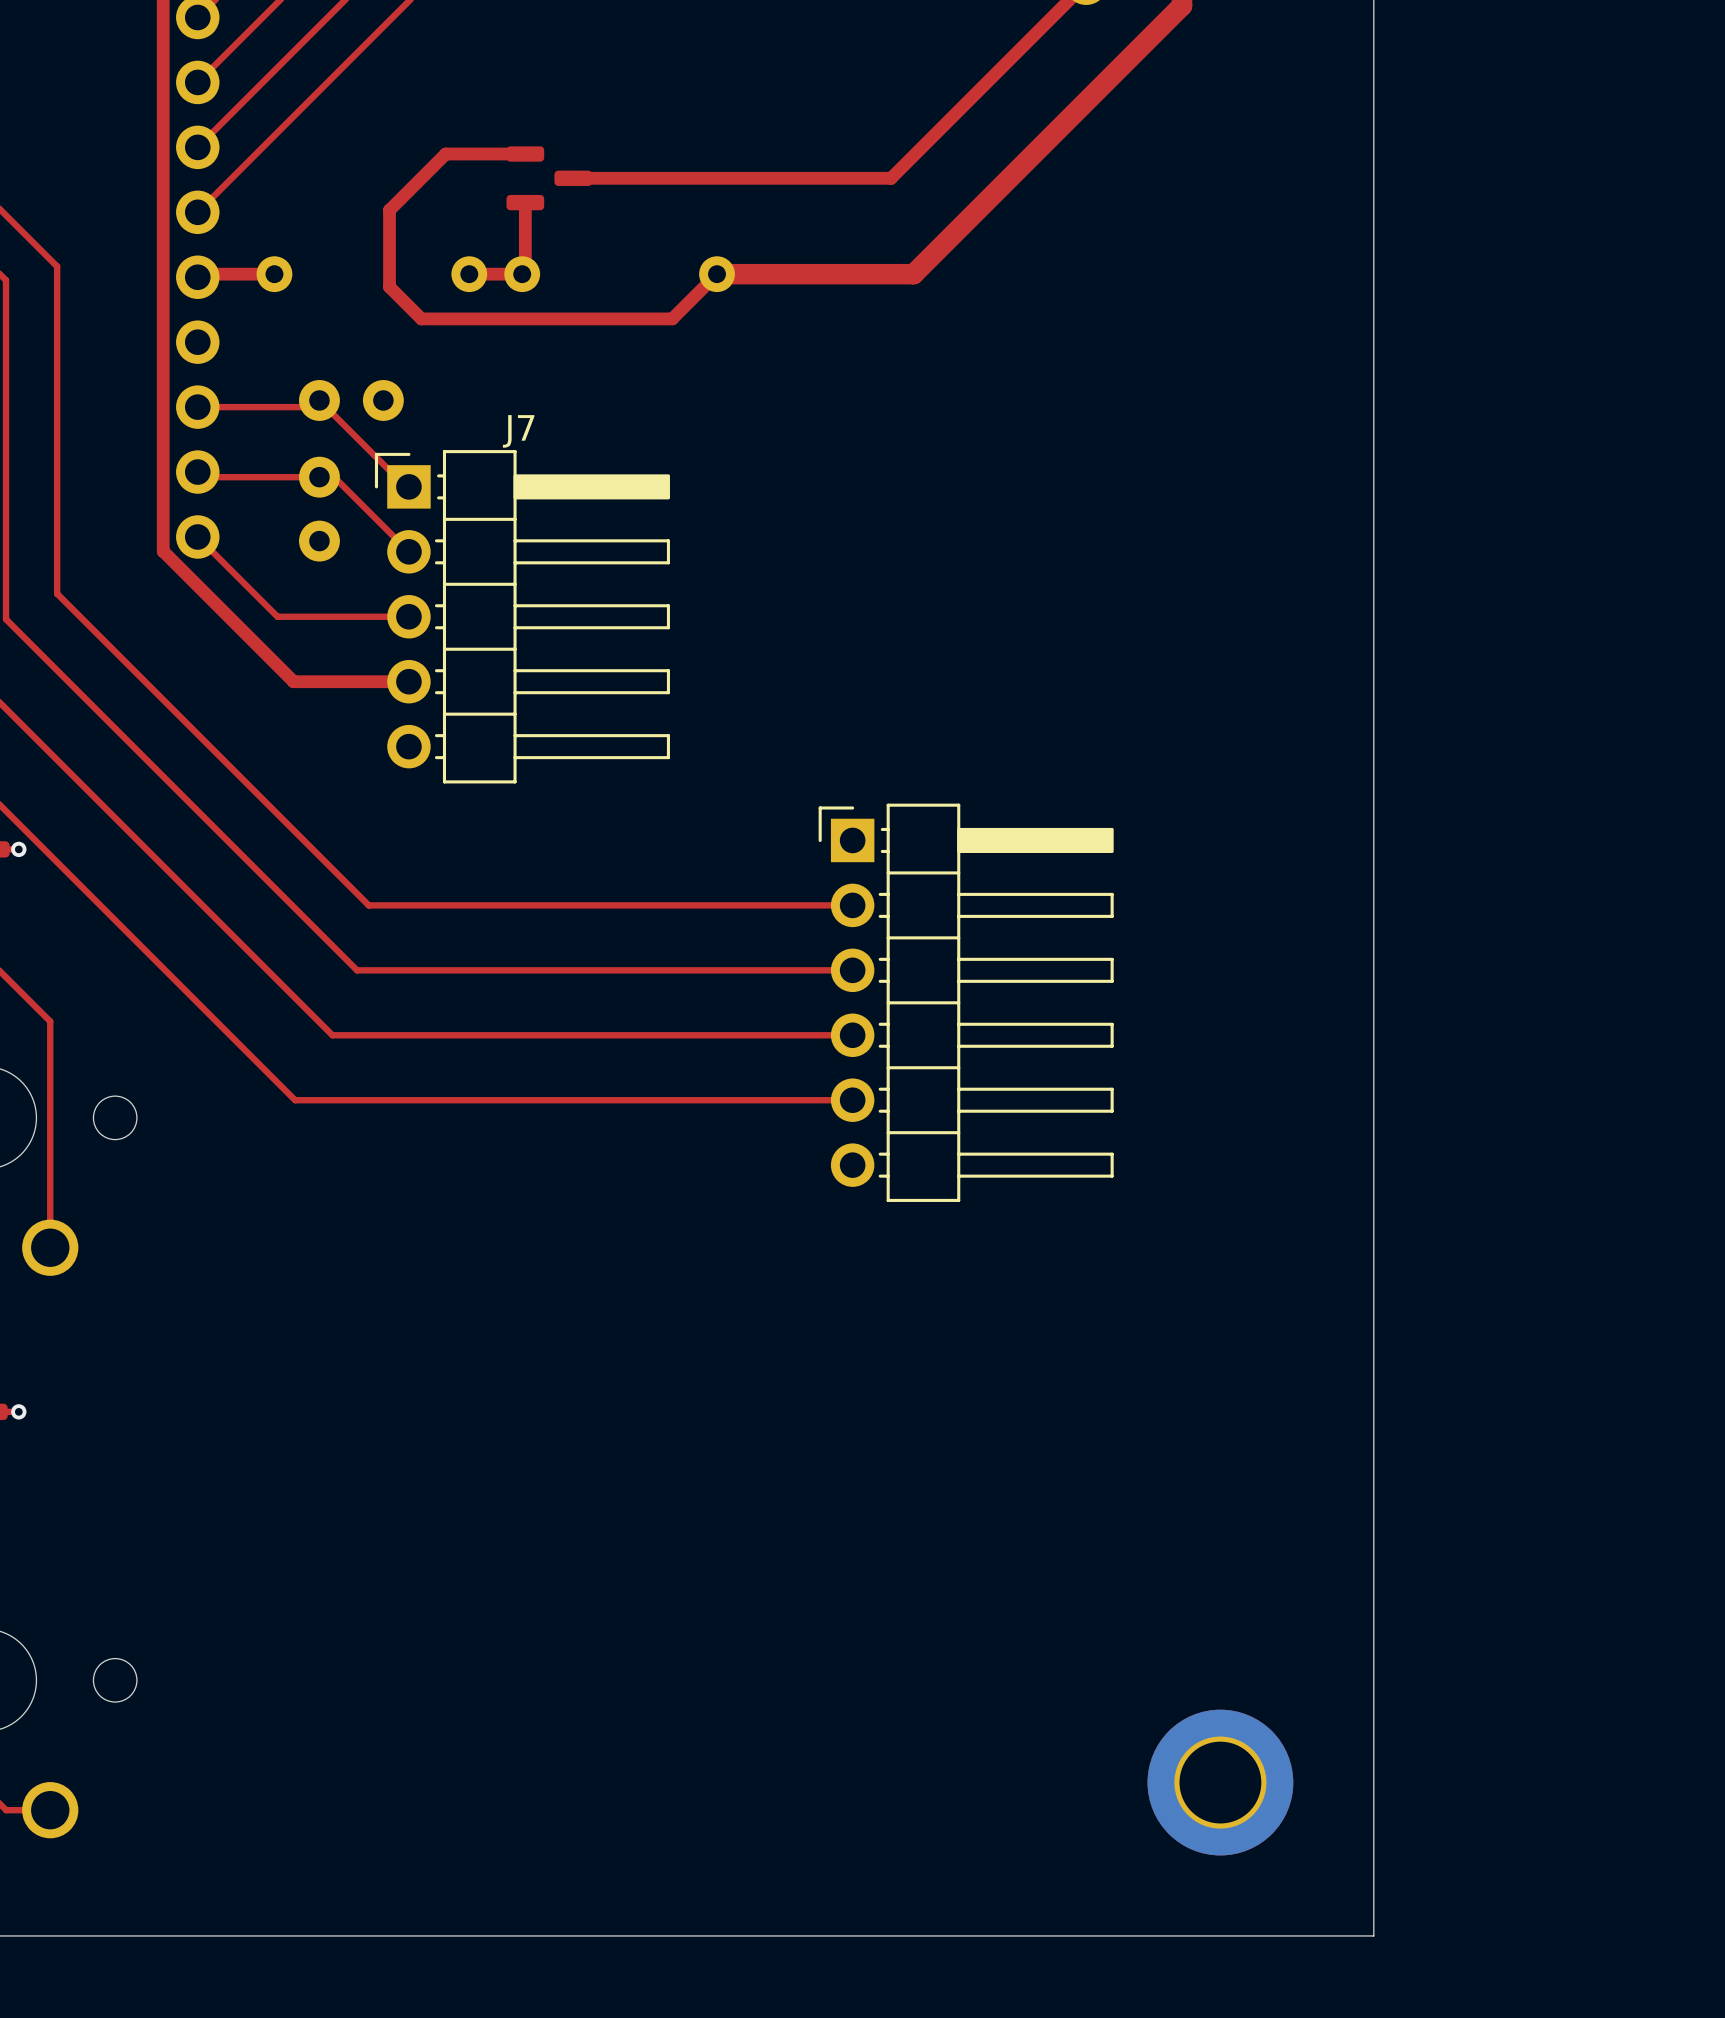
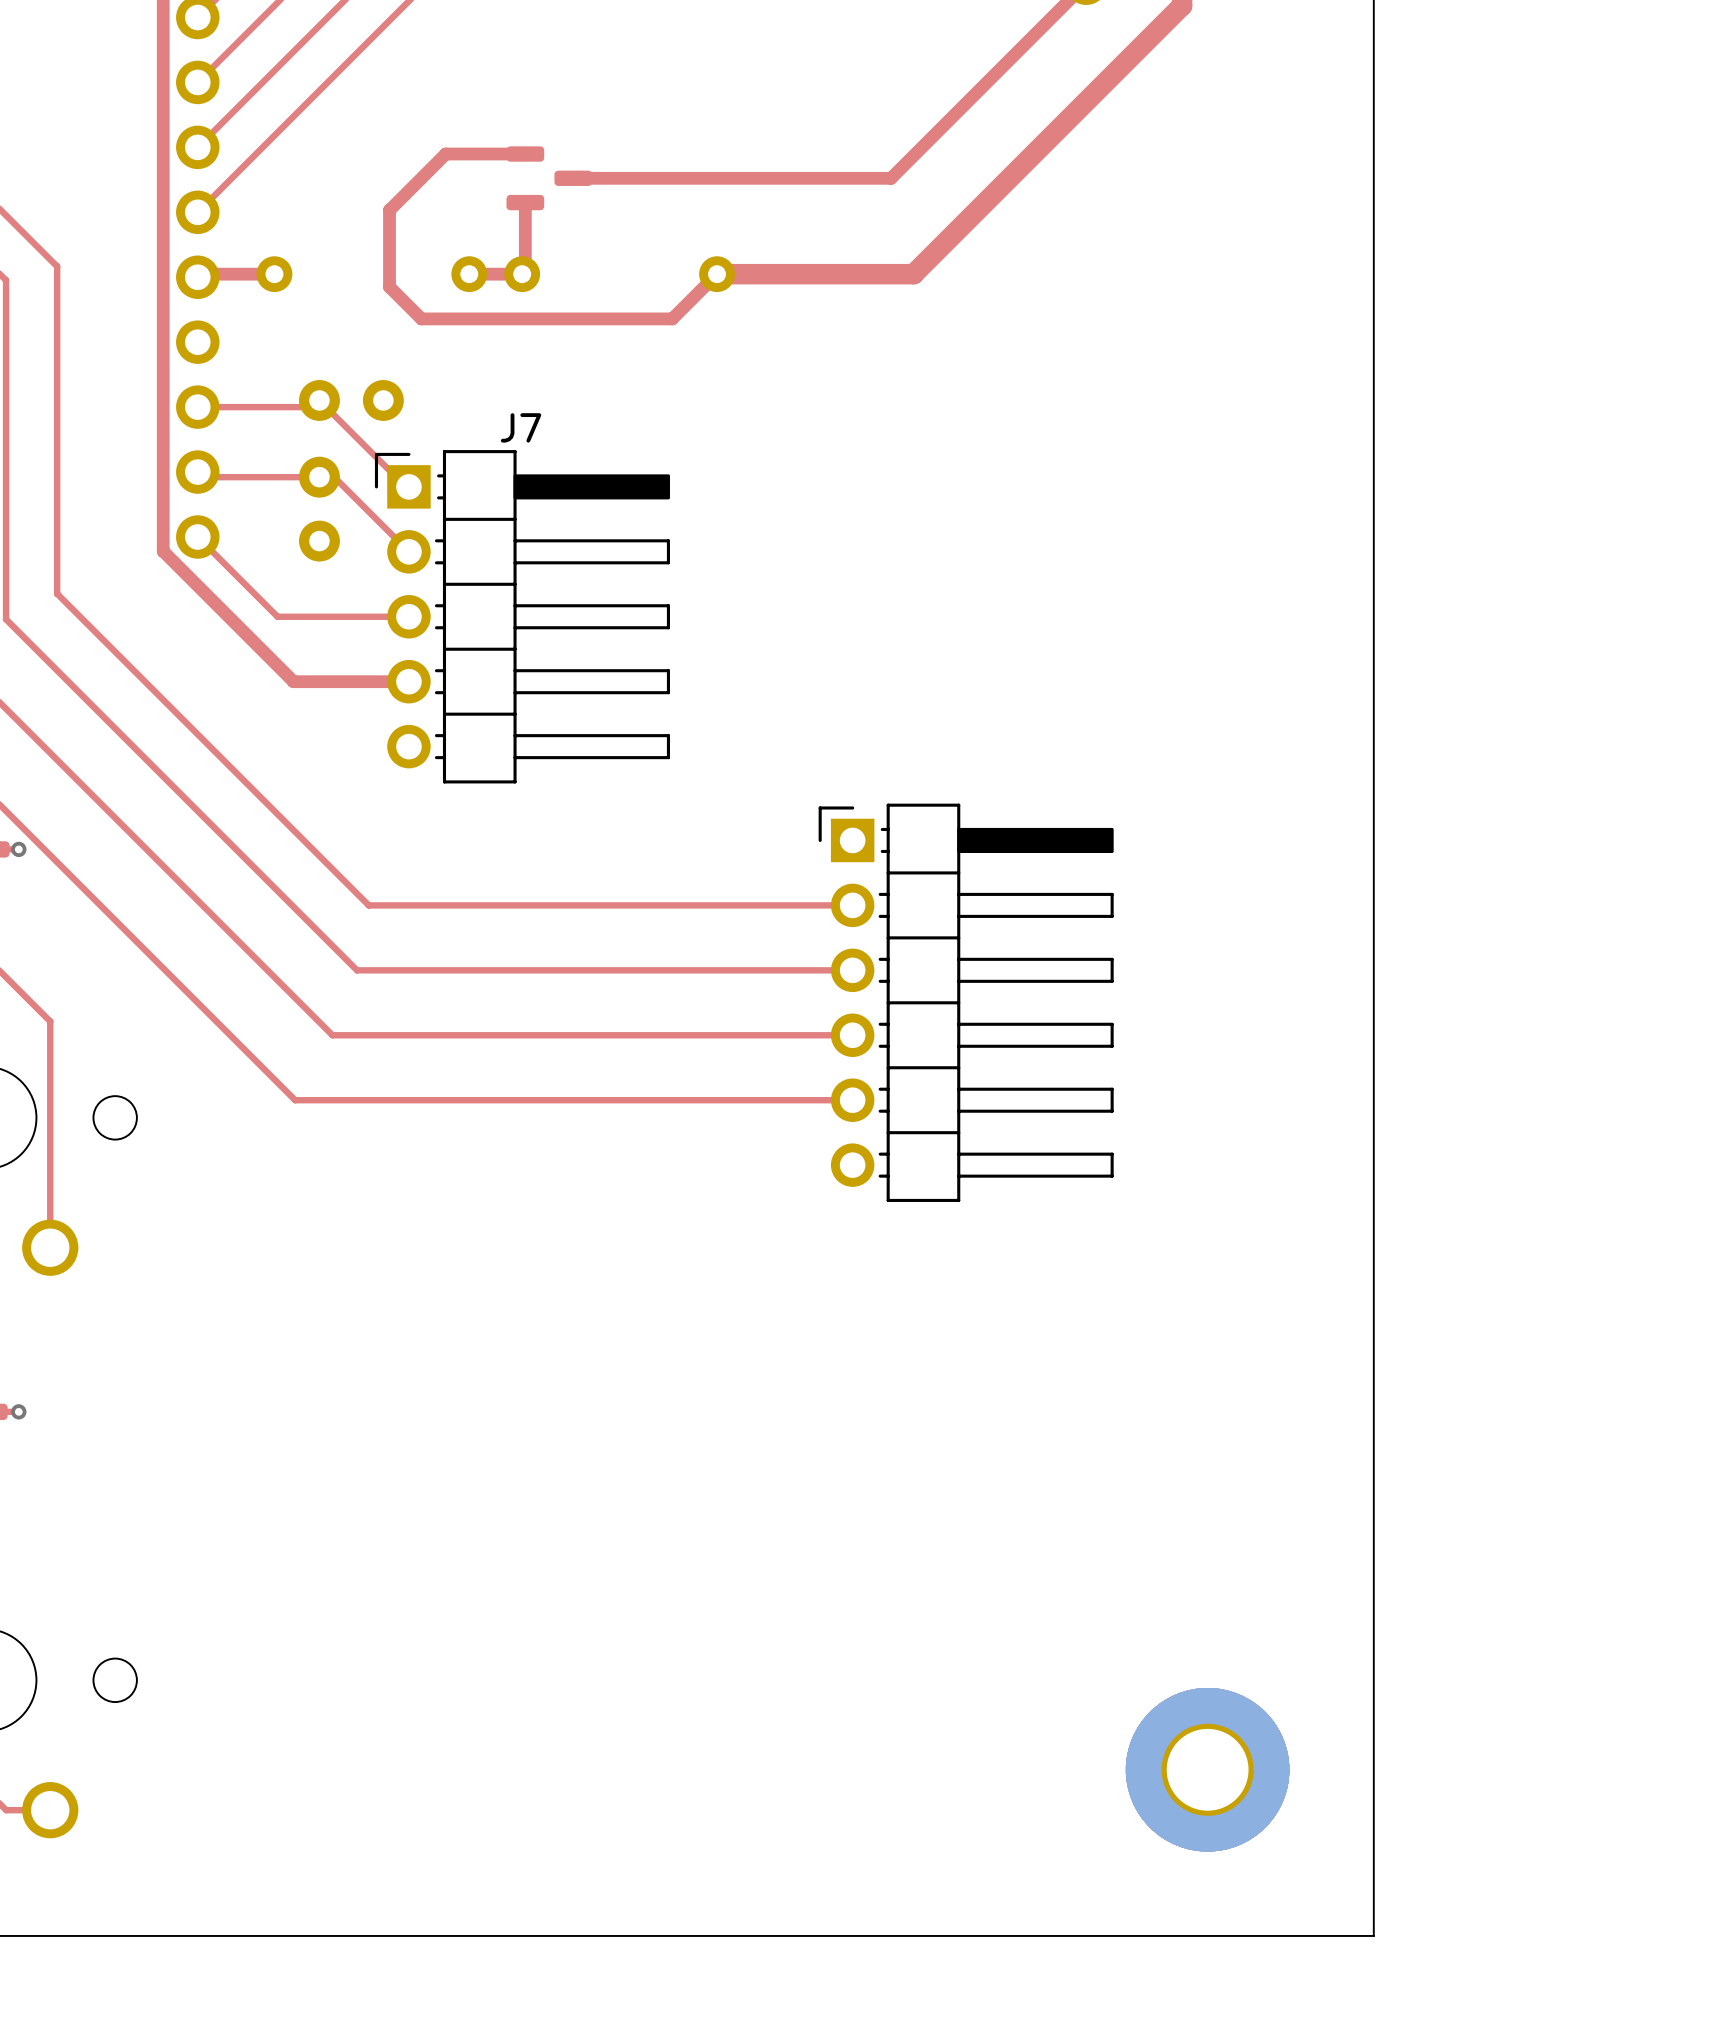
part: none -> (1207, 1769)
part: none -> (1207, 1769)
part: (1220, 1782) -> none

